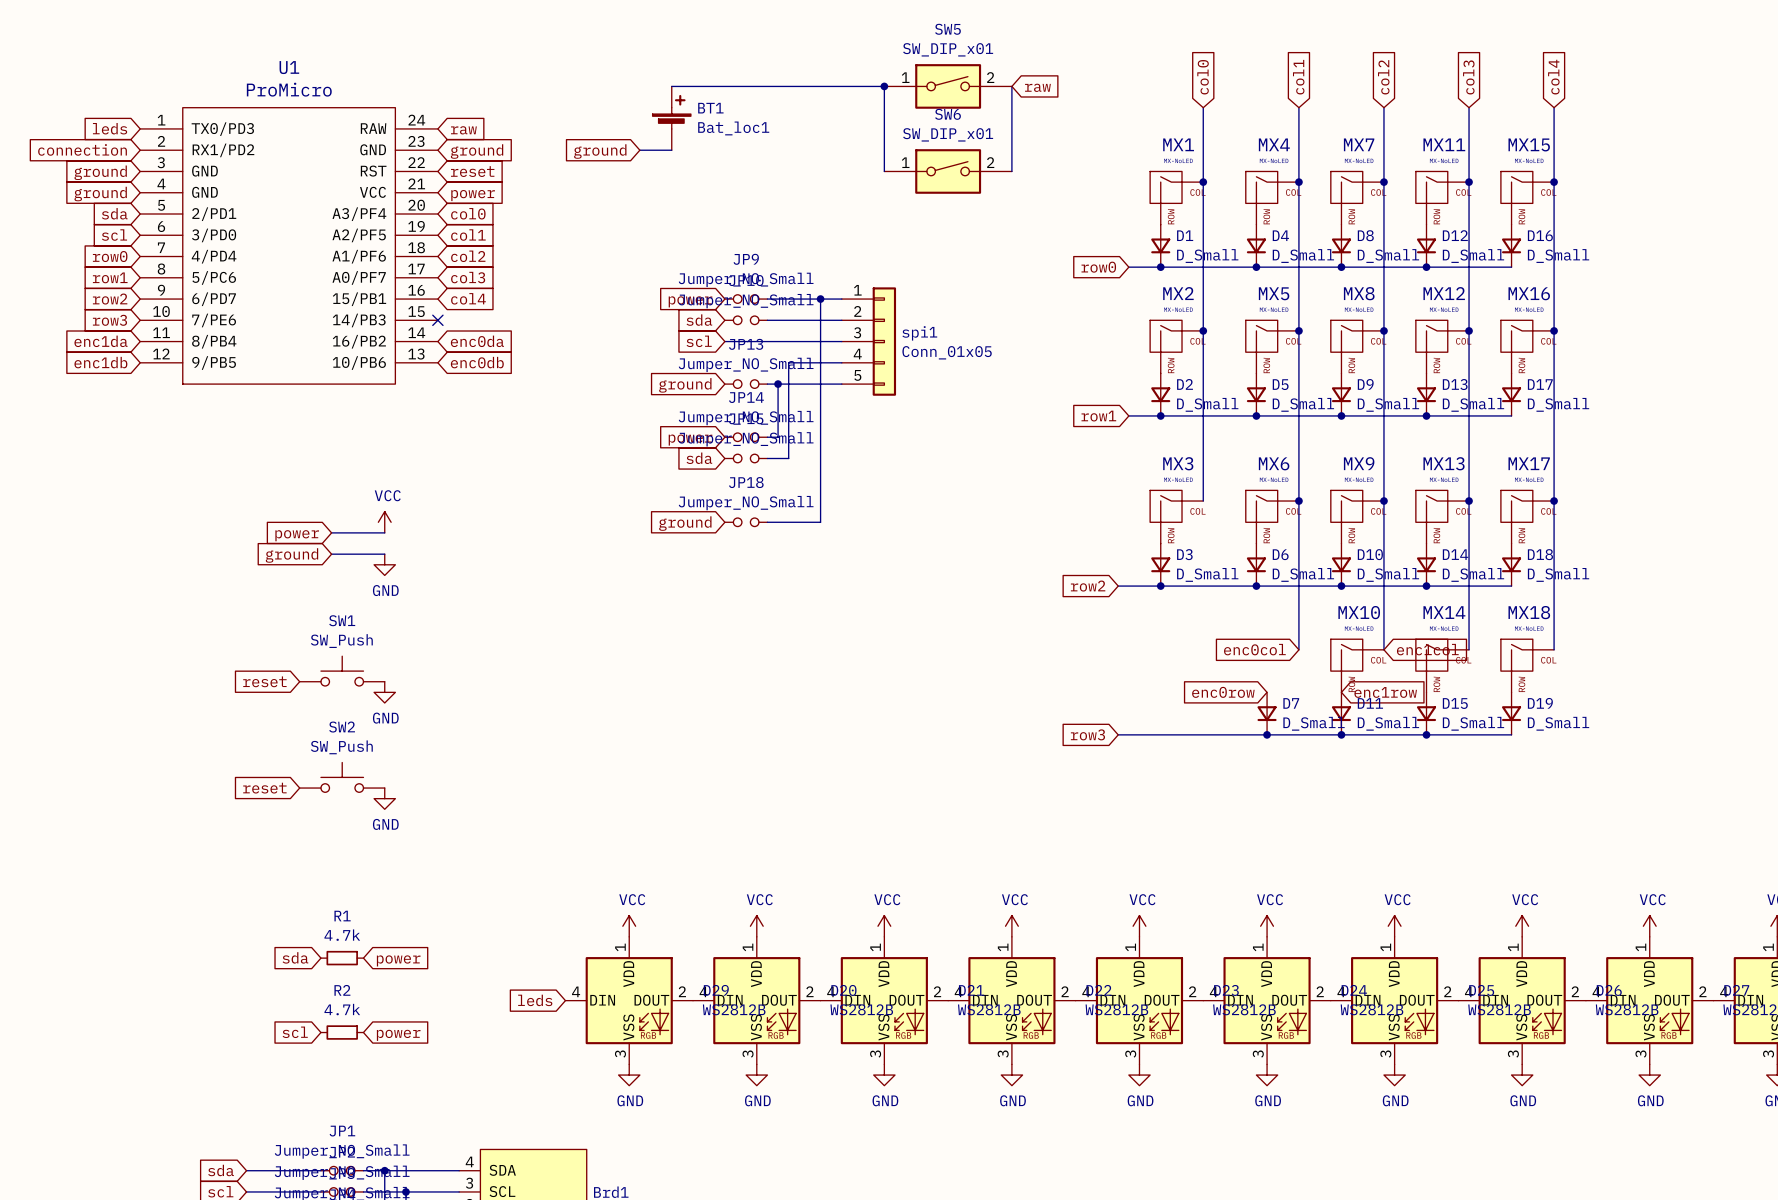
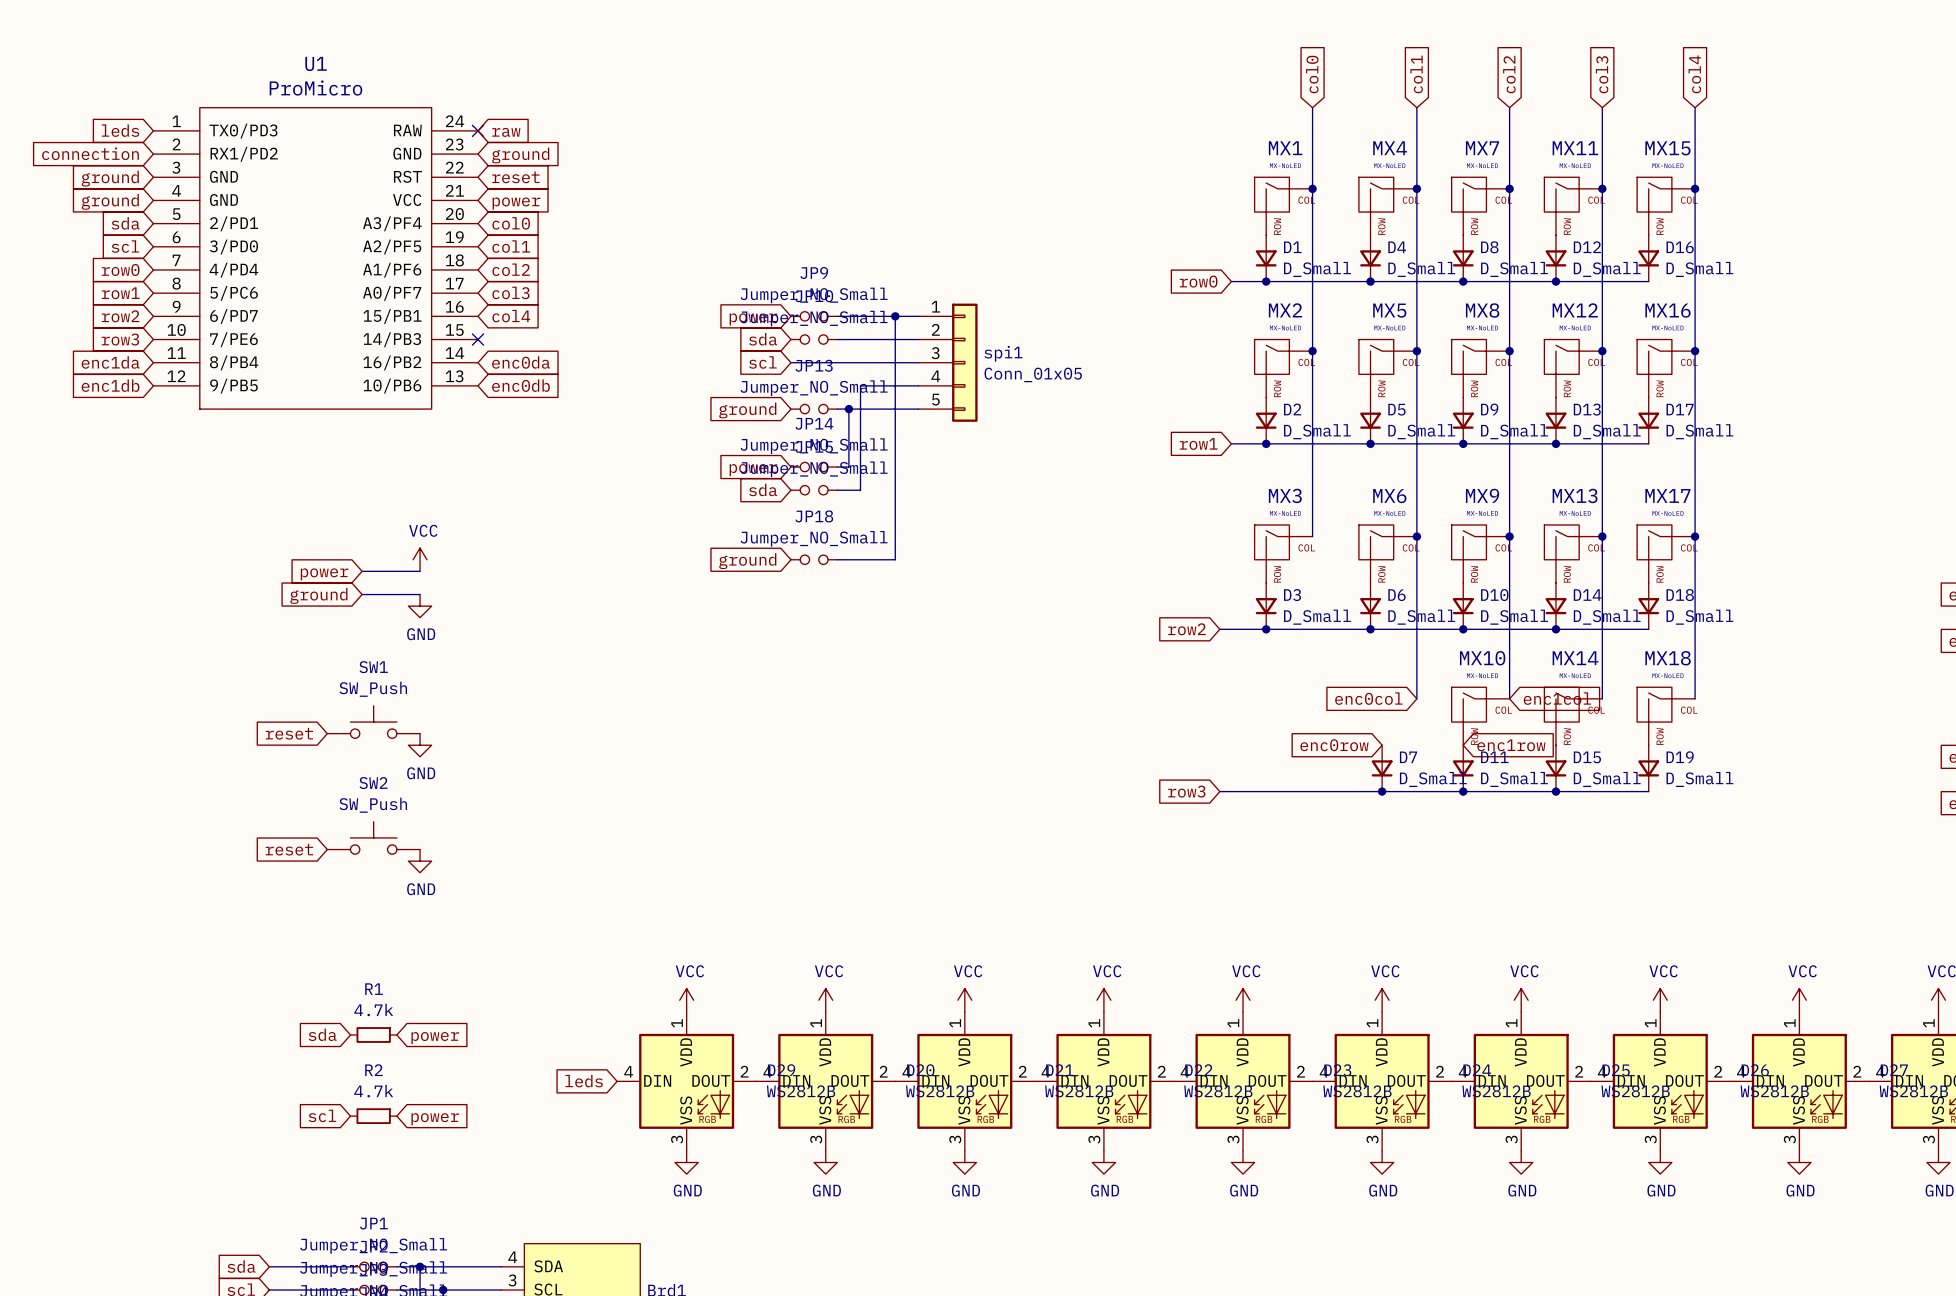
wire: (671, 86) (884, 86) (884, 171) -> none
junction: (884, 86) -> none
SW5: SW_DIP_x01 (948, 86) -> none
wire: (1011, 86) (1011, 171) -> none
global label: raw (1037, 87) -> none
BT1: Bat_loc1 (671, 118) -> none
no-connect mark: none -> (478, 130)
wire: (639, 150) (671, 150) -> none
global label: ground (600, 151) -> none
SW6: SW_DIP_x01 (948, 171) -> none

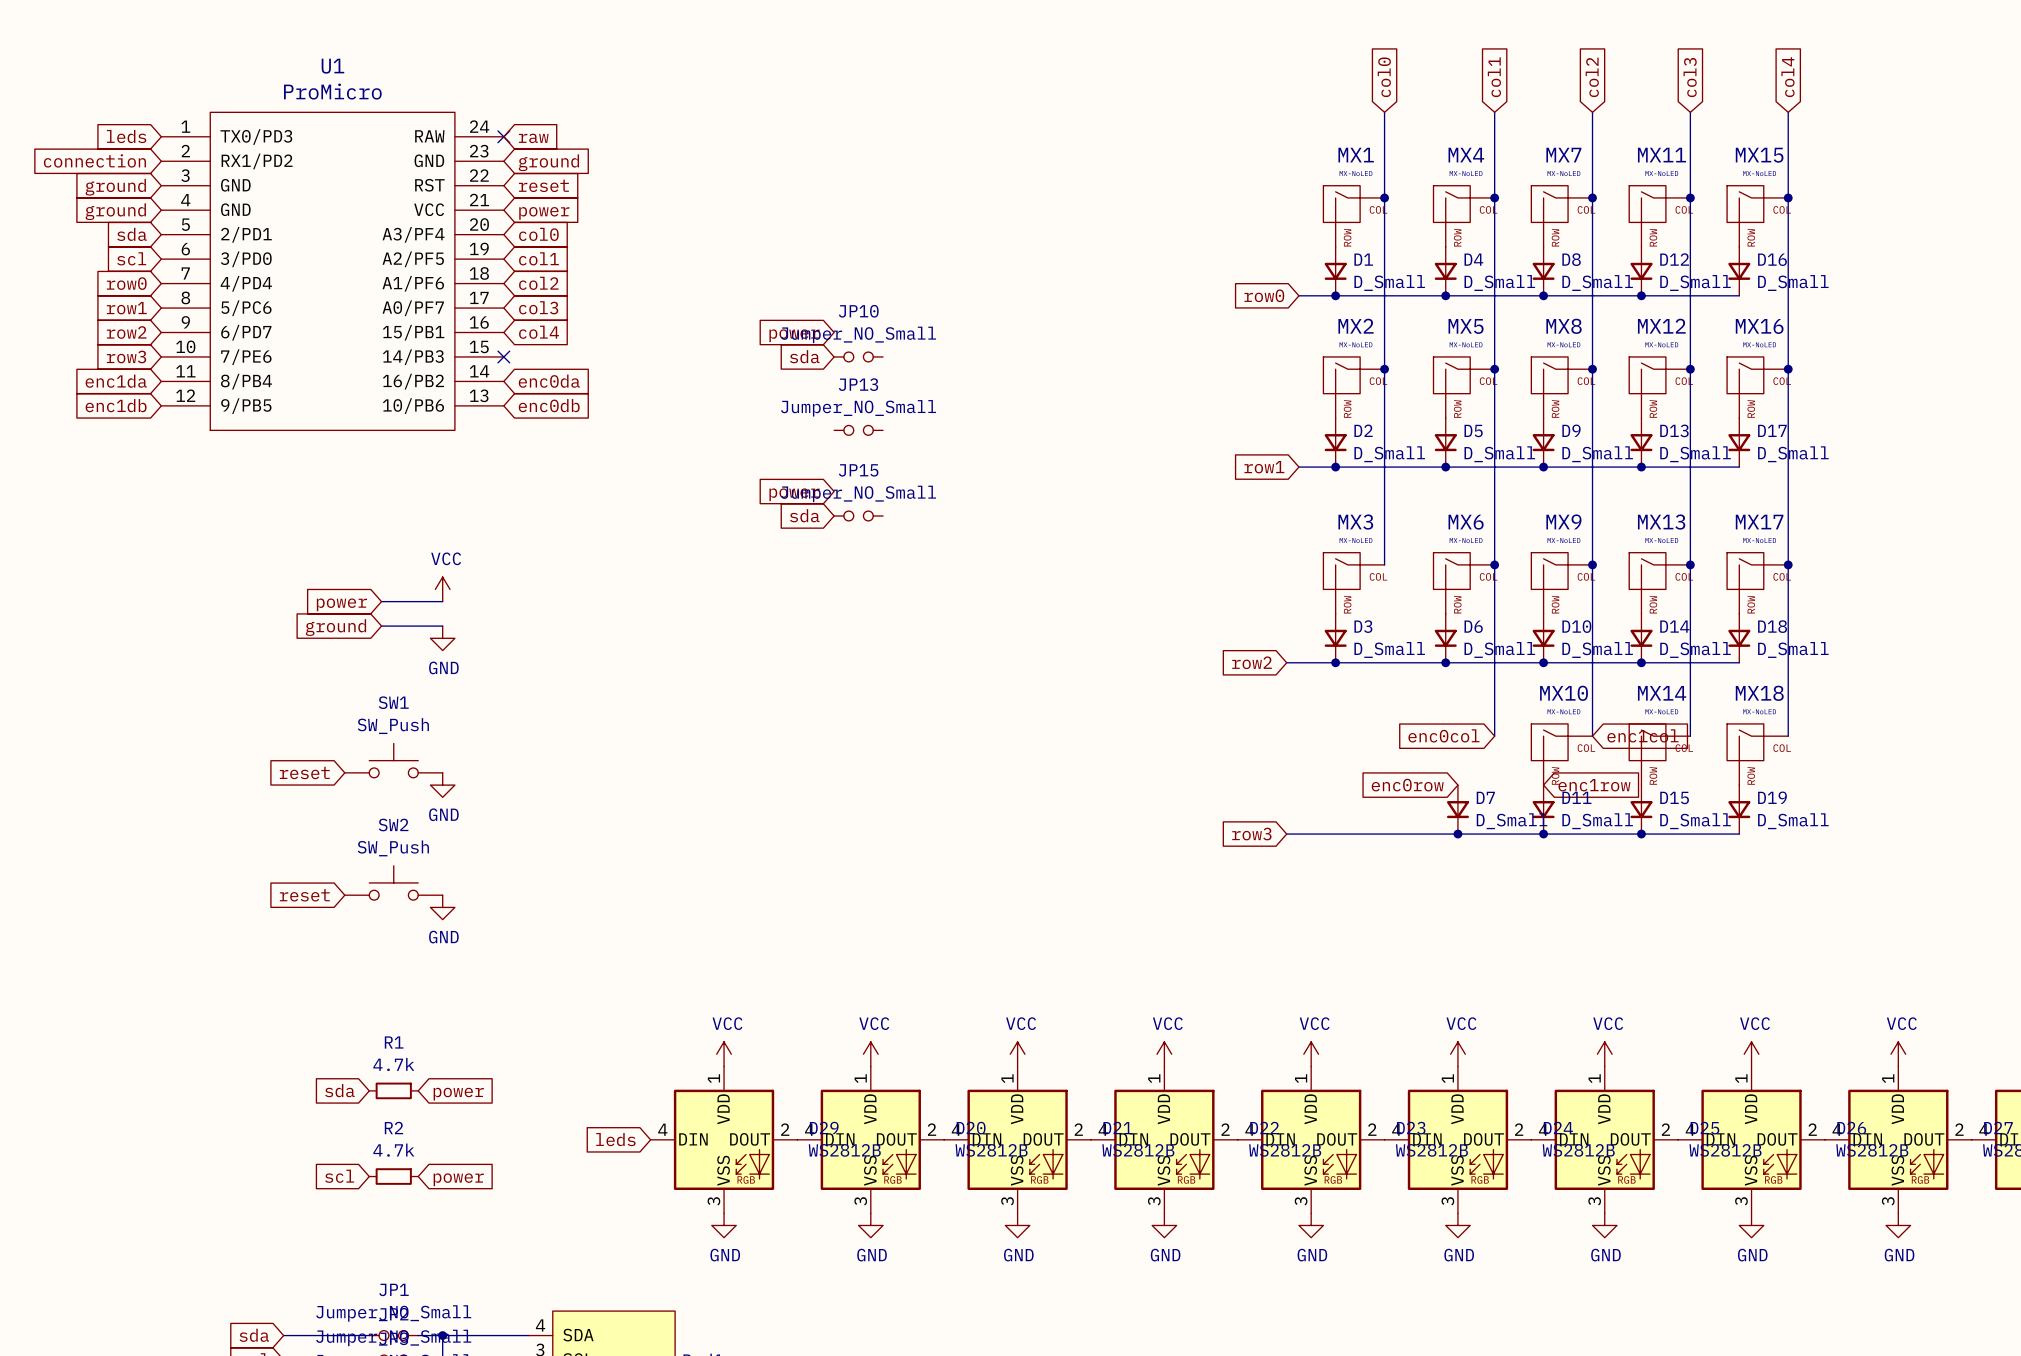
JP9: Jumper_NO_Small (814, 316) -> none
wire: (837, 316) (918, 316) -> none
wire: (895, 316) (895, 559) (837, 559) -> none
junction: (895, 316) -> none
wire: (837, 339) (918, 339) -> none
global label: scl (762, 362) -> none
wire: (790, 362) (918, 362) -> none
spi1: Conn_01x05 (948, 362) -> none
wire: (918, 385) (860, 385) (860, 490) (837, 490) -> none
wire: (837, 409) (918, 409) -> none
wire: (848, 409) (848, 467) (837, 467) -> none
junction: (848, 409) -> none
global label: ground (747, 410) -> none
JP14: Jumper_NO_Small (814, 467) -> none
JP18: Jumper_NO_Small (814, 559) -> none
global label: ground (747, 561) -> none

